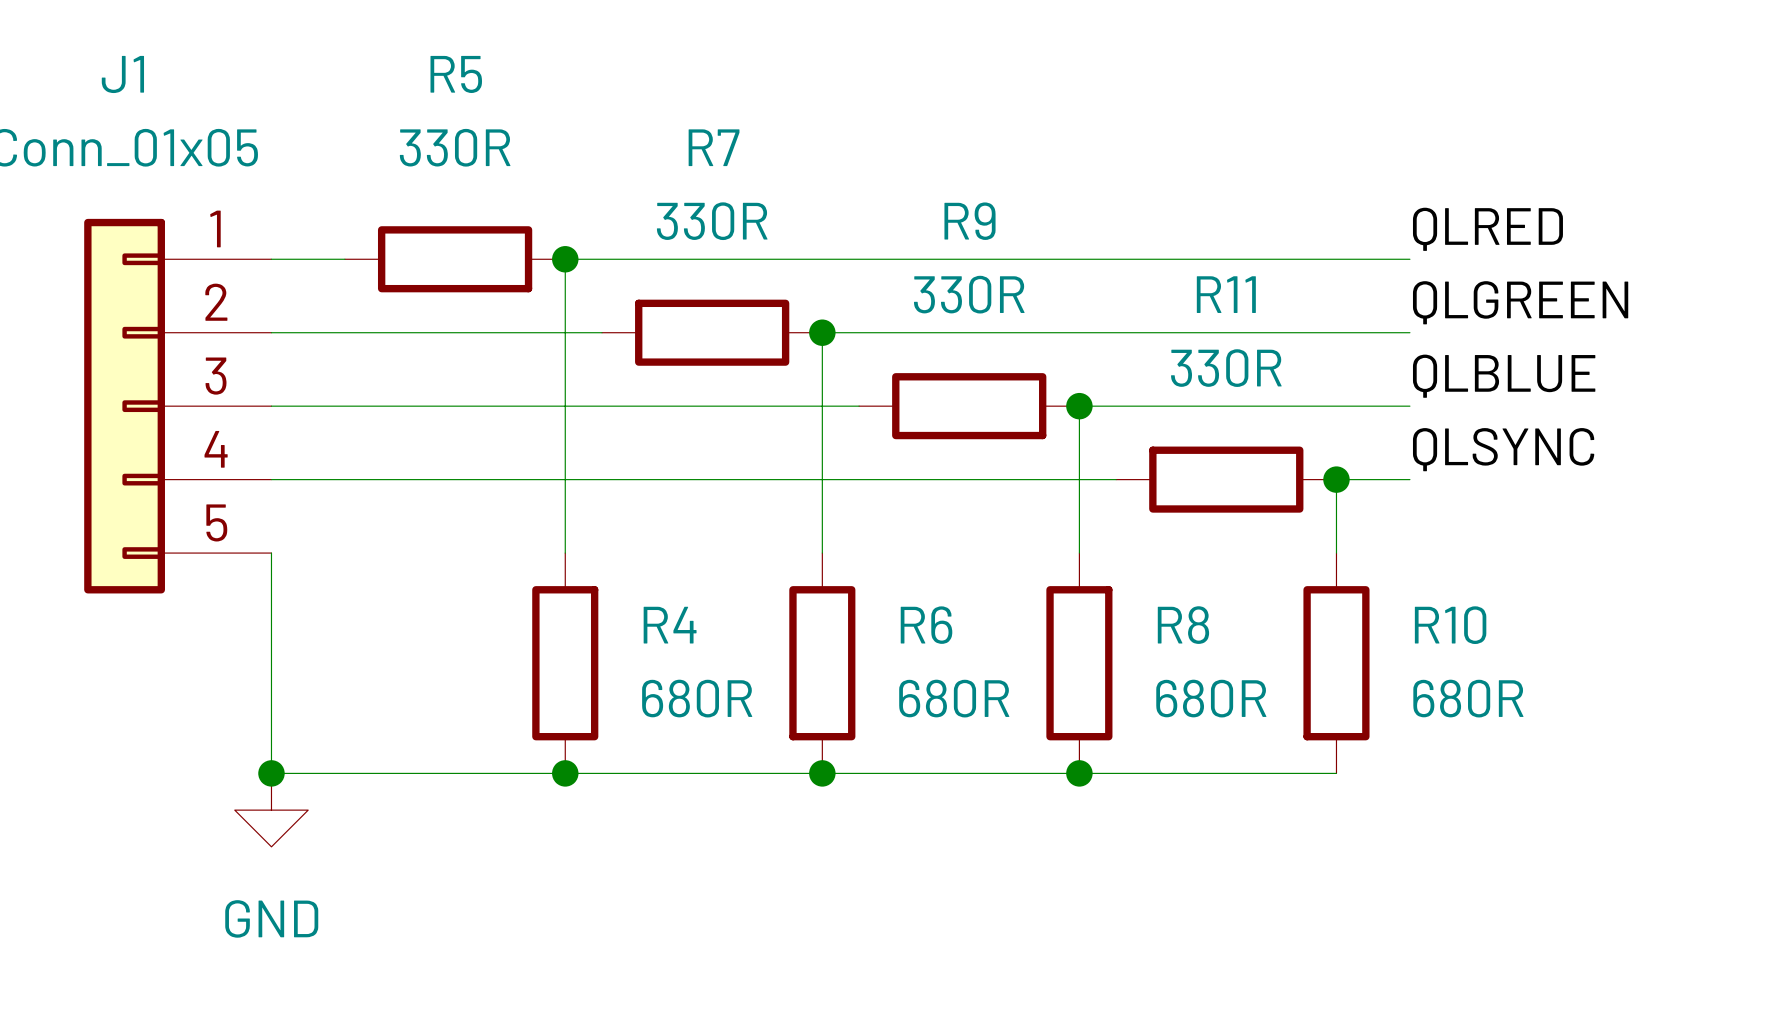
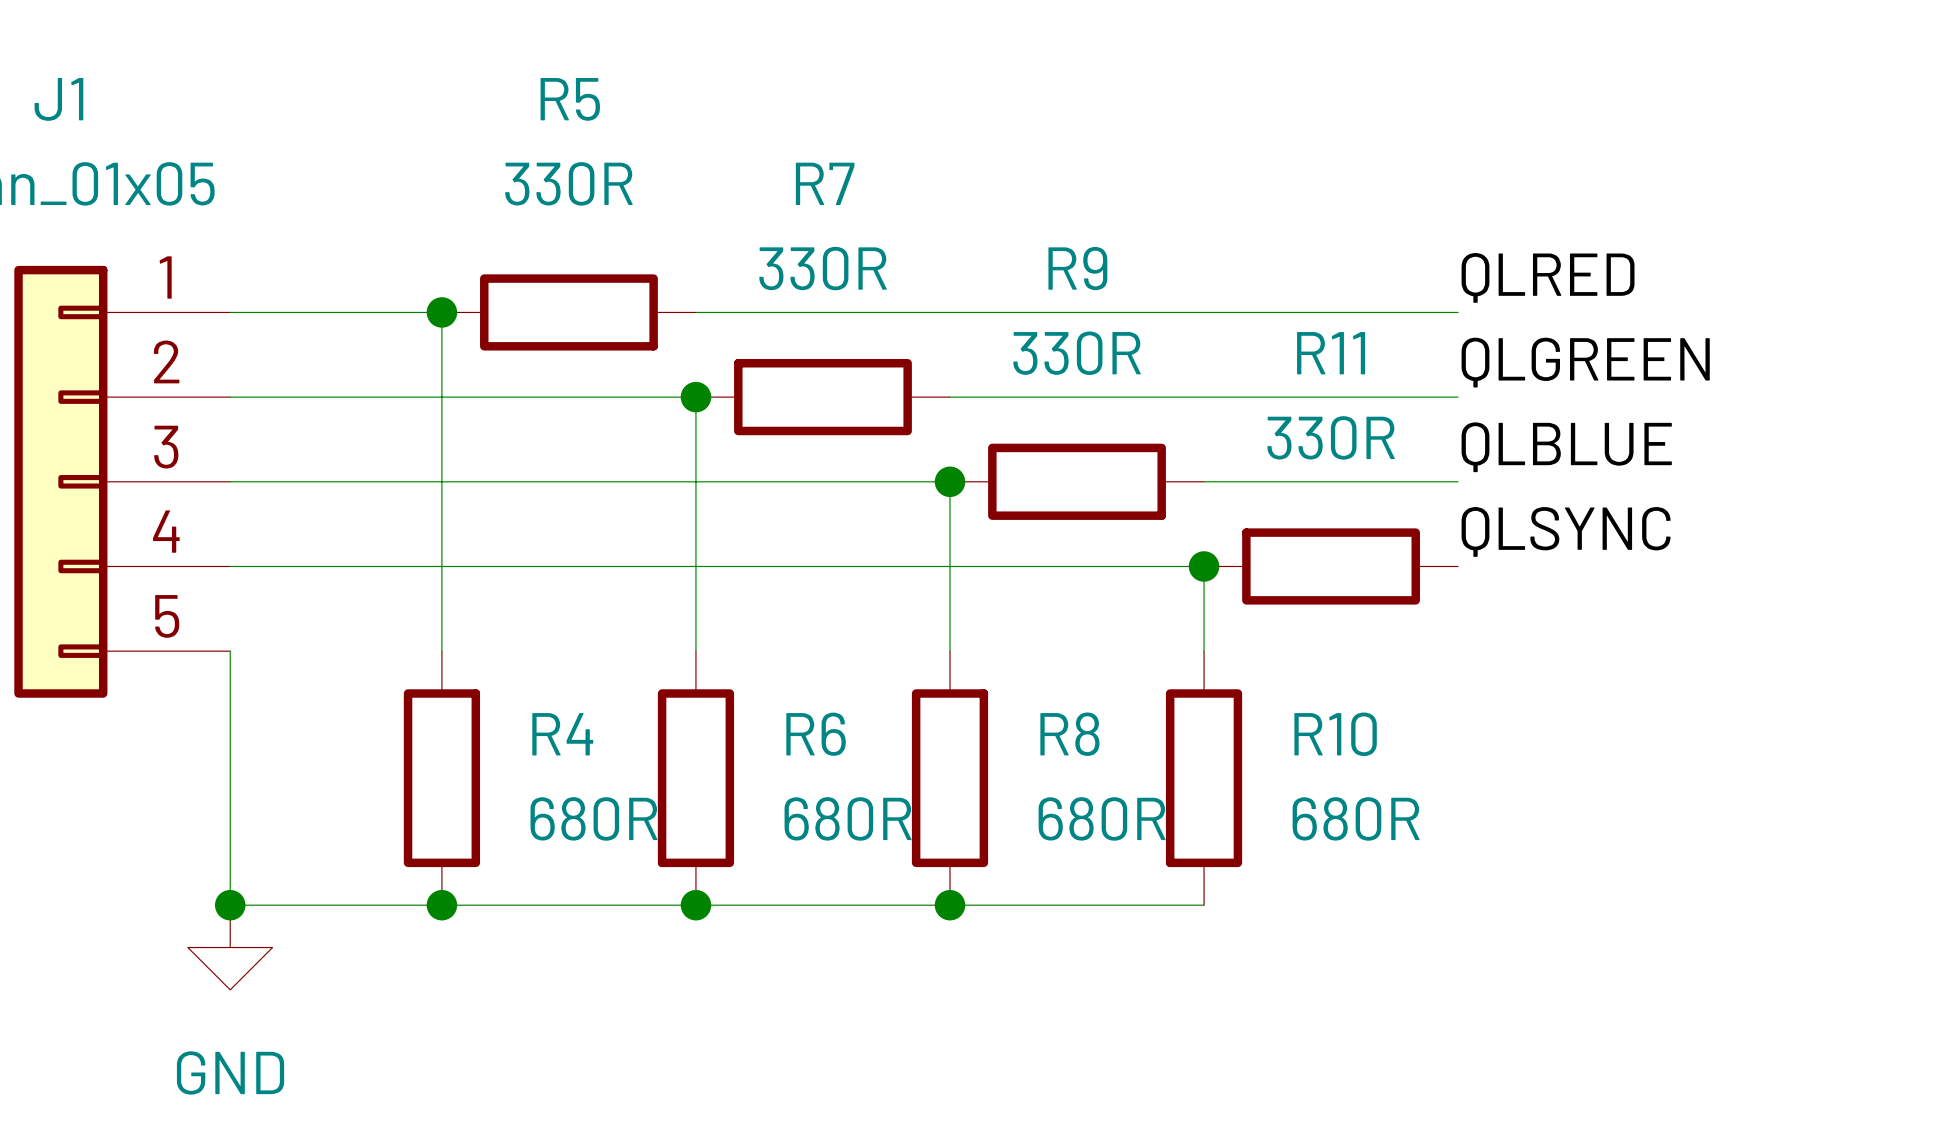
label position: QLRED (1487, 229) -> QLRED (1548, 277)
wire: none -> (314, 312) (441, 312) (441, 651)
junction: none -> (441, 312)
R5 position: (455, 259) -> (568, 312)
junction: (565, 259) -> none
wire: (675, 259) (565, 259) (565, 553) -> none
wire: (1336, 259) (1409, 259) -> none
label position: QLGREEN (1520, 302) -> QLGREEN (1585, 362)
wire: none -> (611, 397) (695, 397) (695, 651)
junction: none -> (695, 397)
R7 position: (712, 332) -> (822, 397)
junction: (822, 332) -> none
wire: (895, 332) (822, 332) (822, 553) -> none
wire: (1336, 332) (1409, 332) -> none
label position: QLBLUE (1504, 376) -> QLBLUE (1566, 447)
wire: none -> (907, 481) (950, 481) (950, 651)
junction: none -> (950, 481)
R9 position: (969, 406) -> (1077, 481)
junction position: (1079, 406) -> (1204, 566)
wire: (1116, 406) (1079, 406) (1079, 553) -> none
wire: (1336, 406) (1409, 406) -> none
label position: QLSYNC (1503, 449) -> QLSYNC (1566, 531)
wire: none -> (1204, 566) (1204, 651)
junction: (1336, 479) -> none
wire: (1409, 479) (1336, 479) (1336, 553) -> none
R4 position: (565, 663) -> (441, 778)
R6 position: (822, 663) -> (695, 778)
R8 position: (1079, 663) -> (950, 778)
R10 position: (1336, 663) -> (1204, 778)
junction: none -> (441, 905)
junction: (565, 773) -> none
junction: none -> (695, 905)
junction: (822, 773) -> none
junction: none -> (950, 905)
junction: (1079, 773) -> none
wire: (1116, 773) (1336, 773) -> none

